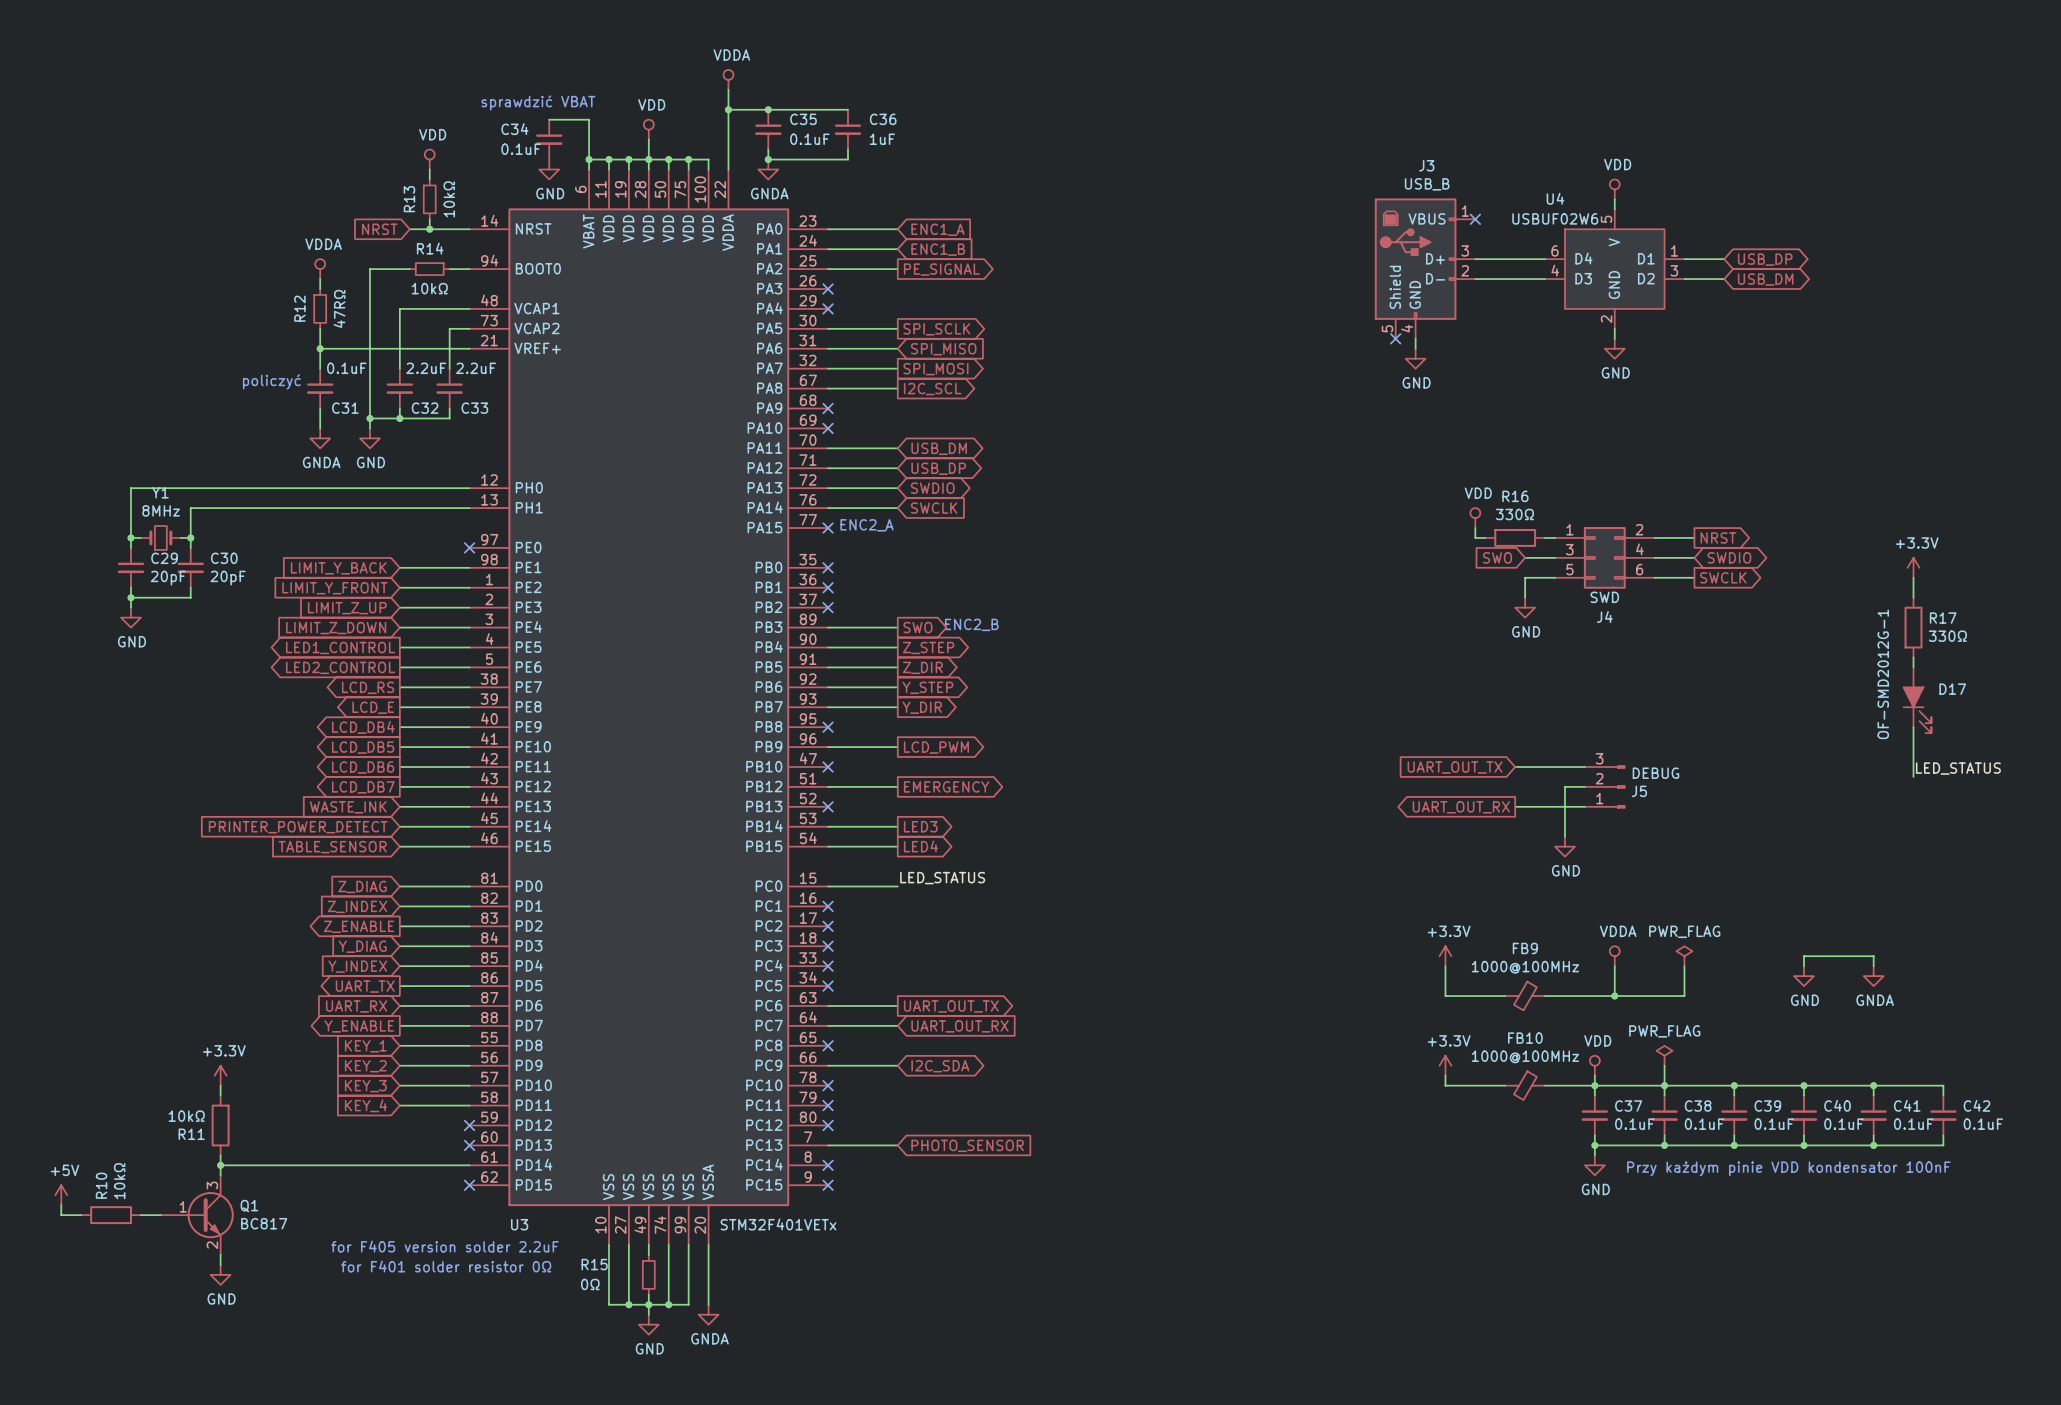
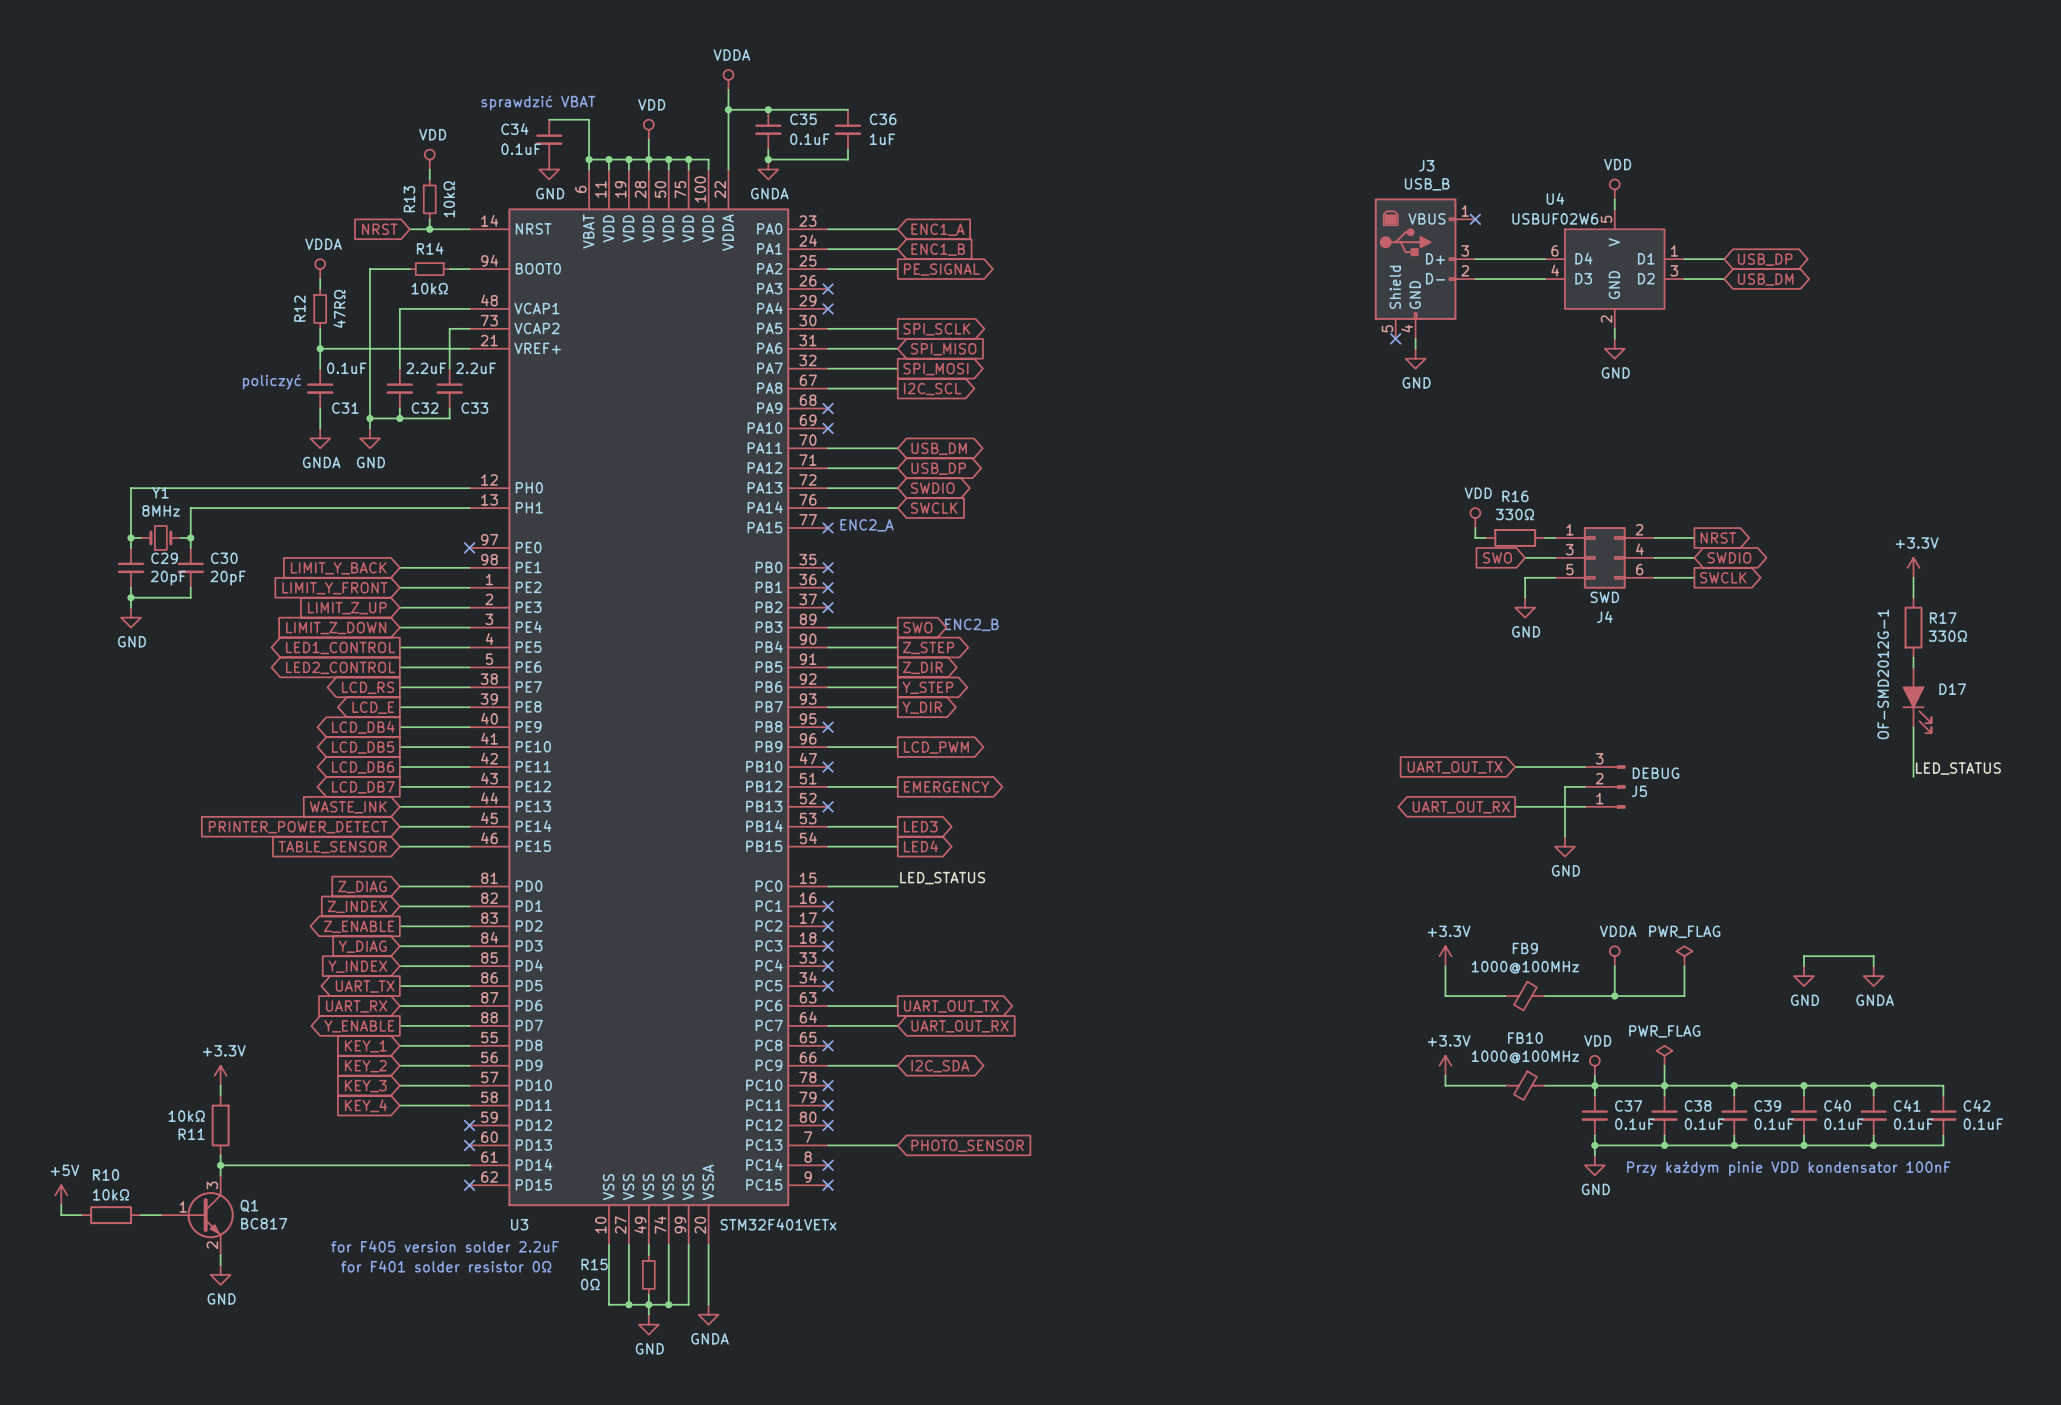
R10 value rotation: 0° (119, 1181) -> 90° clockwise (110, 1194)
R10 name rotation: 0° (101, 1185) -> 90° clockwise (106, 1174)

